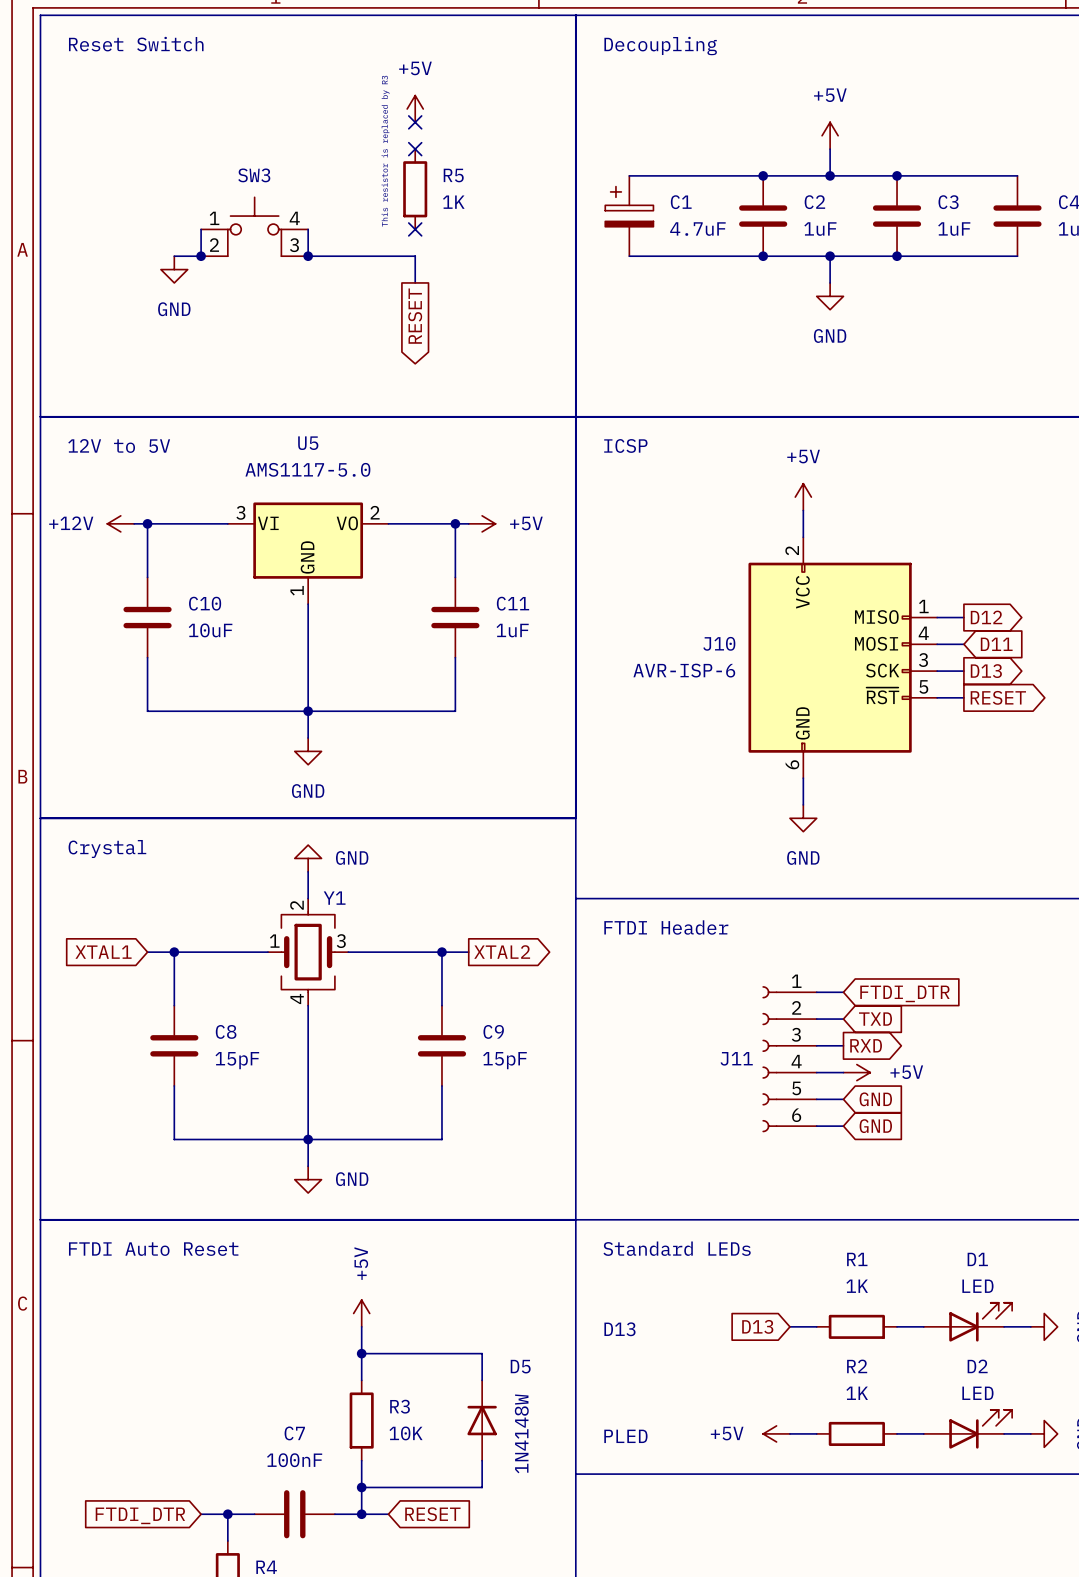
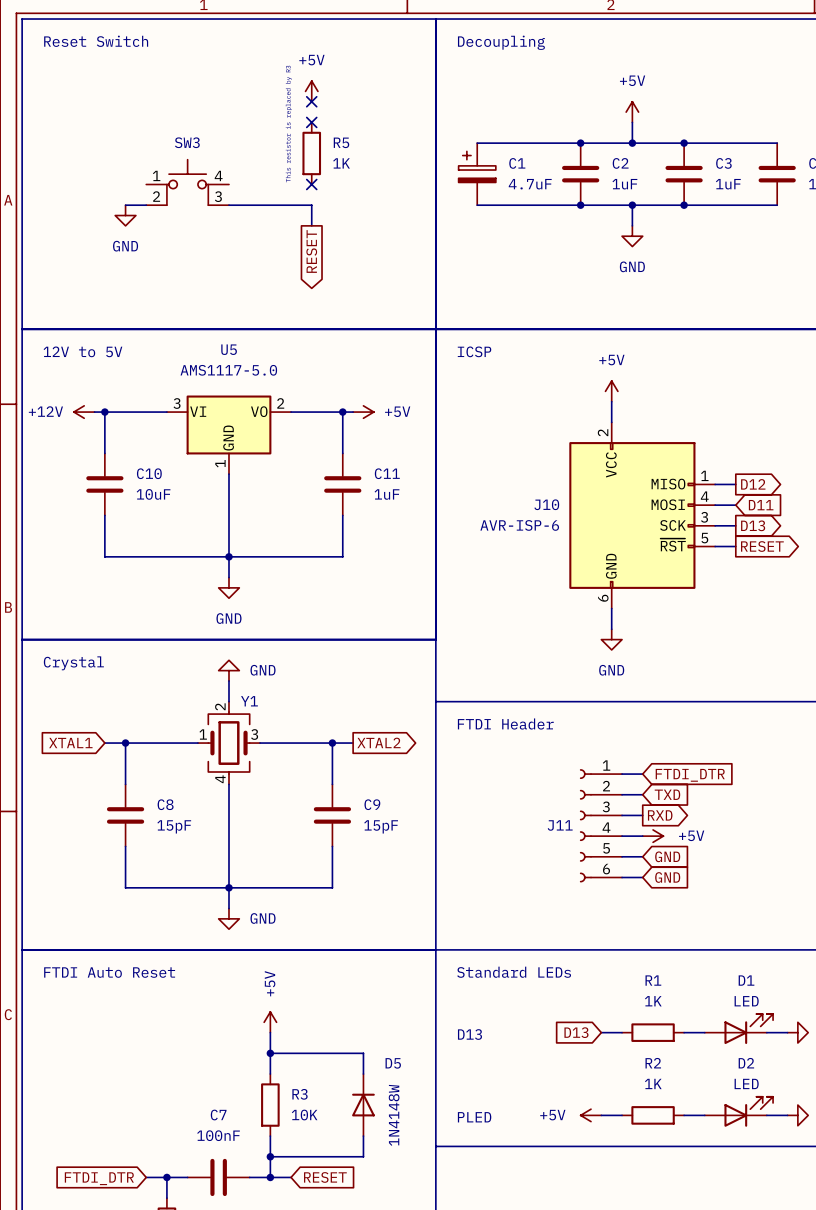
wire: (201, 229) (201, 256) -> none
wire: (308, 229) (308, 256) -> none
junction: (201, 256) -> none
junction: (308, 256) -> none

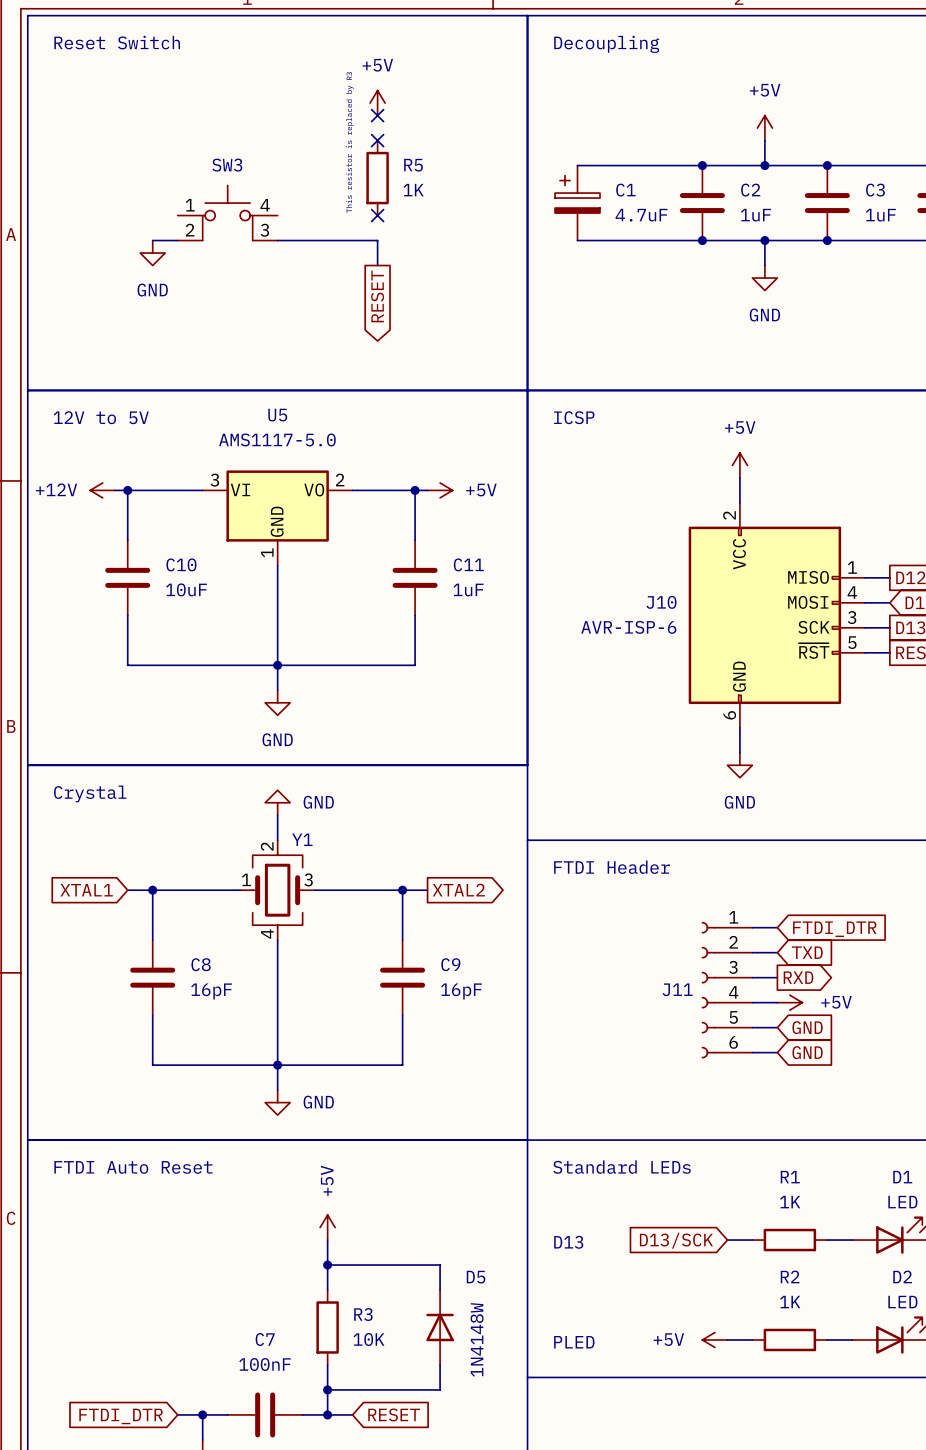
C8 value: 15pF (174, 826) -> 16pF (211, 991)
C9 value: 15pF (381, 826) -> 16pF (461, 991)
global label: D13 (576, 1032) -> D13/SCK (676, 1240)

